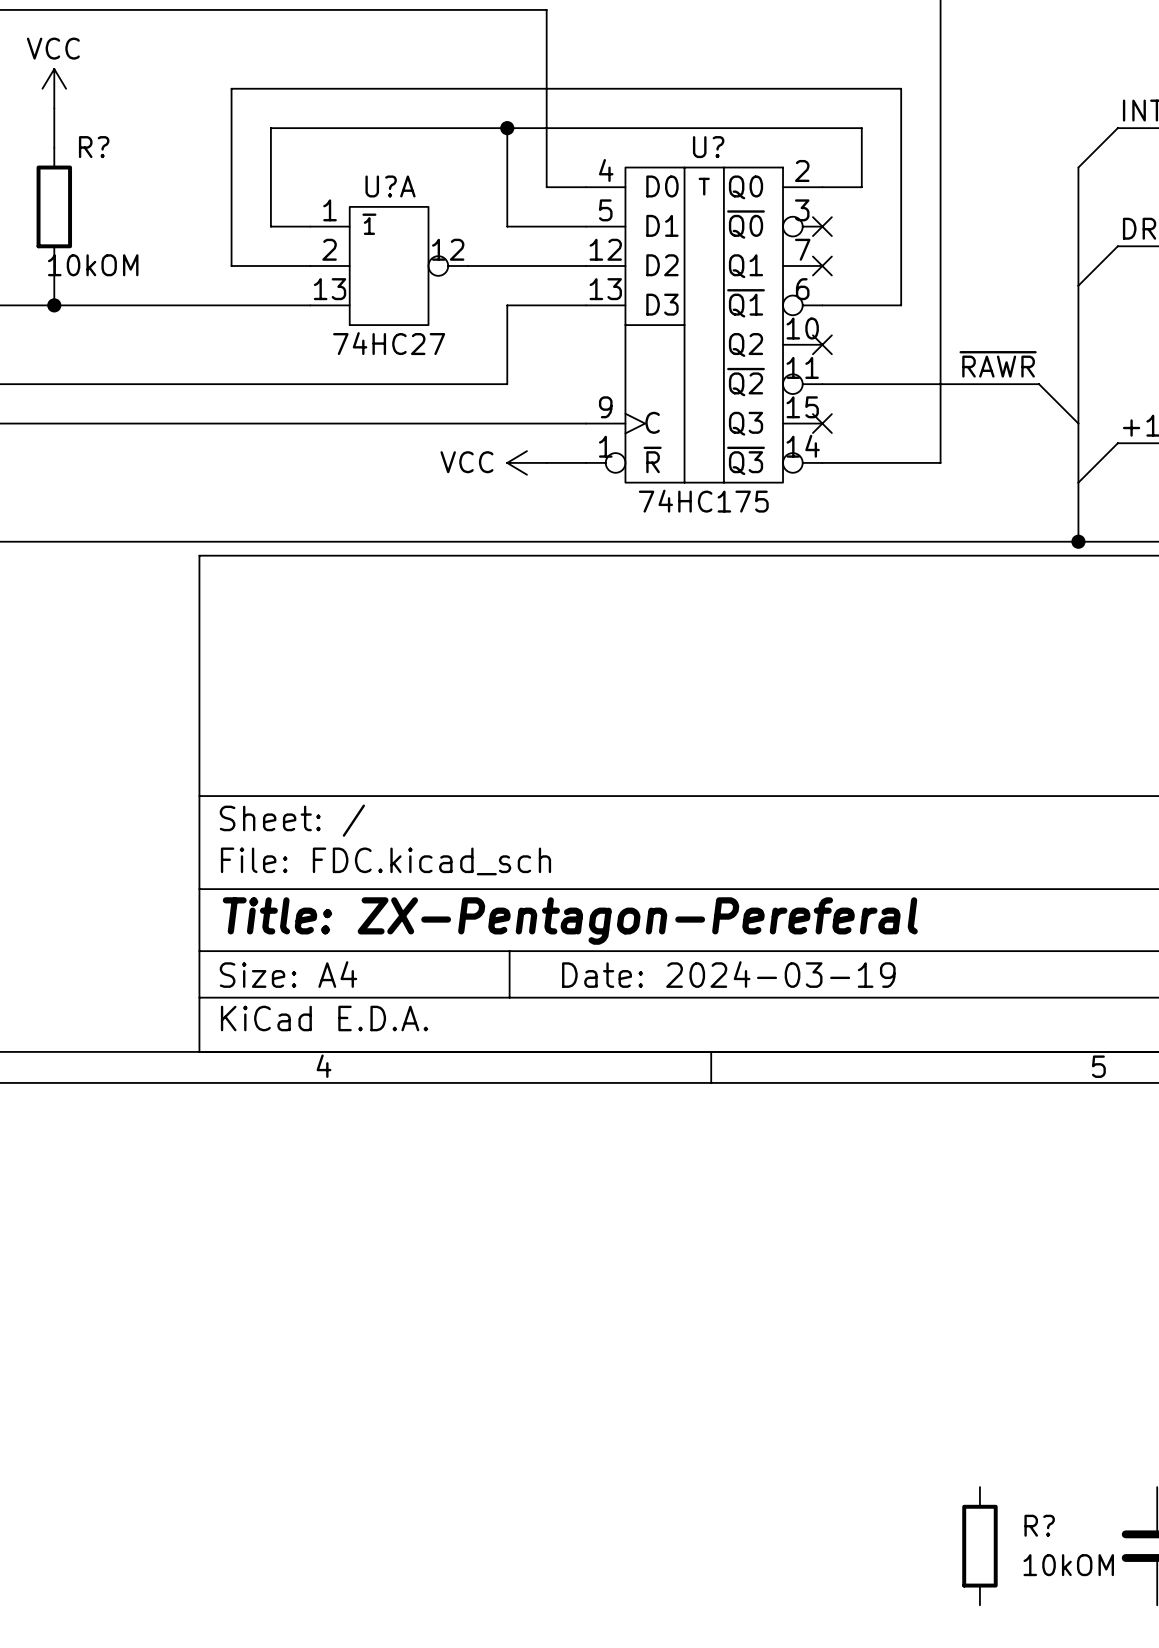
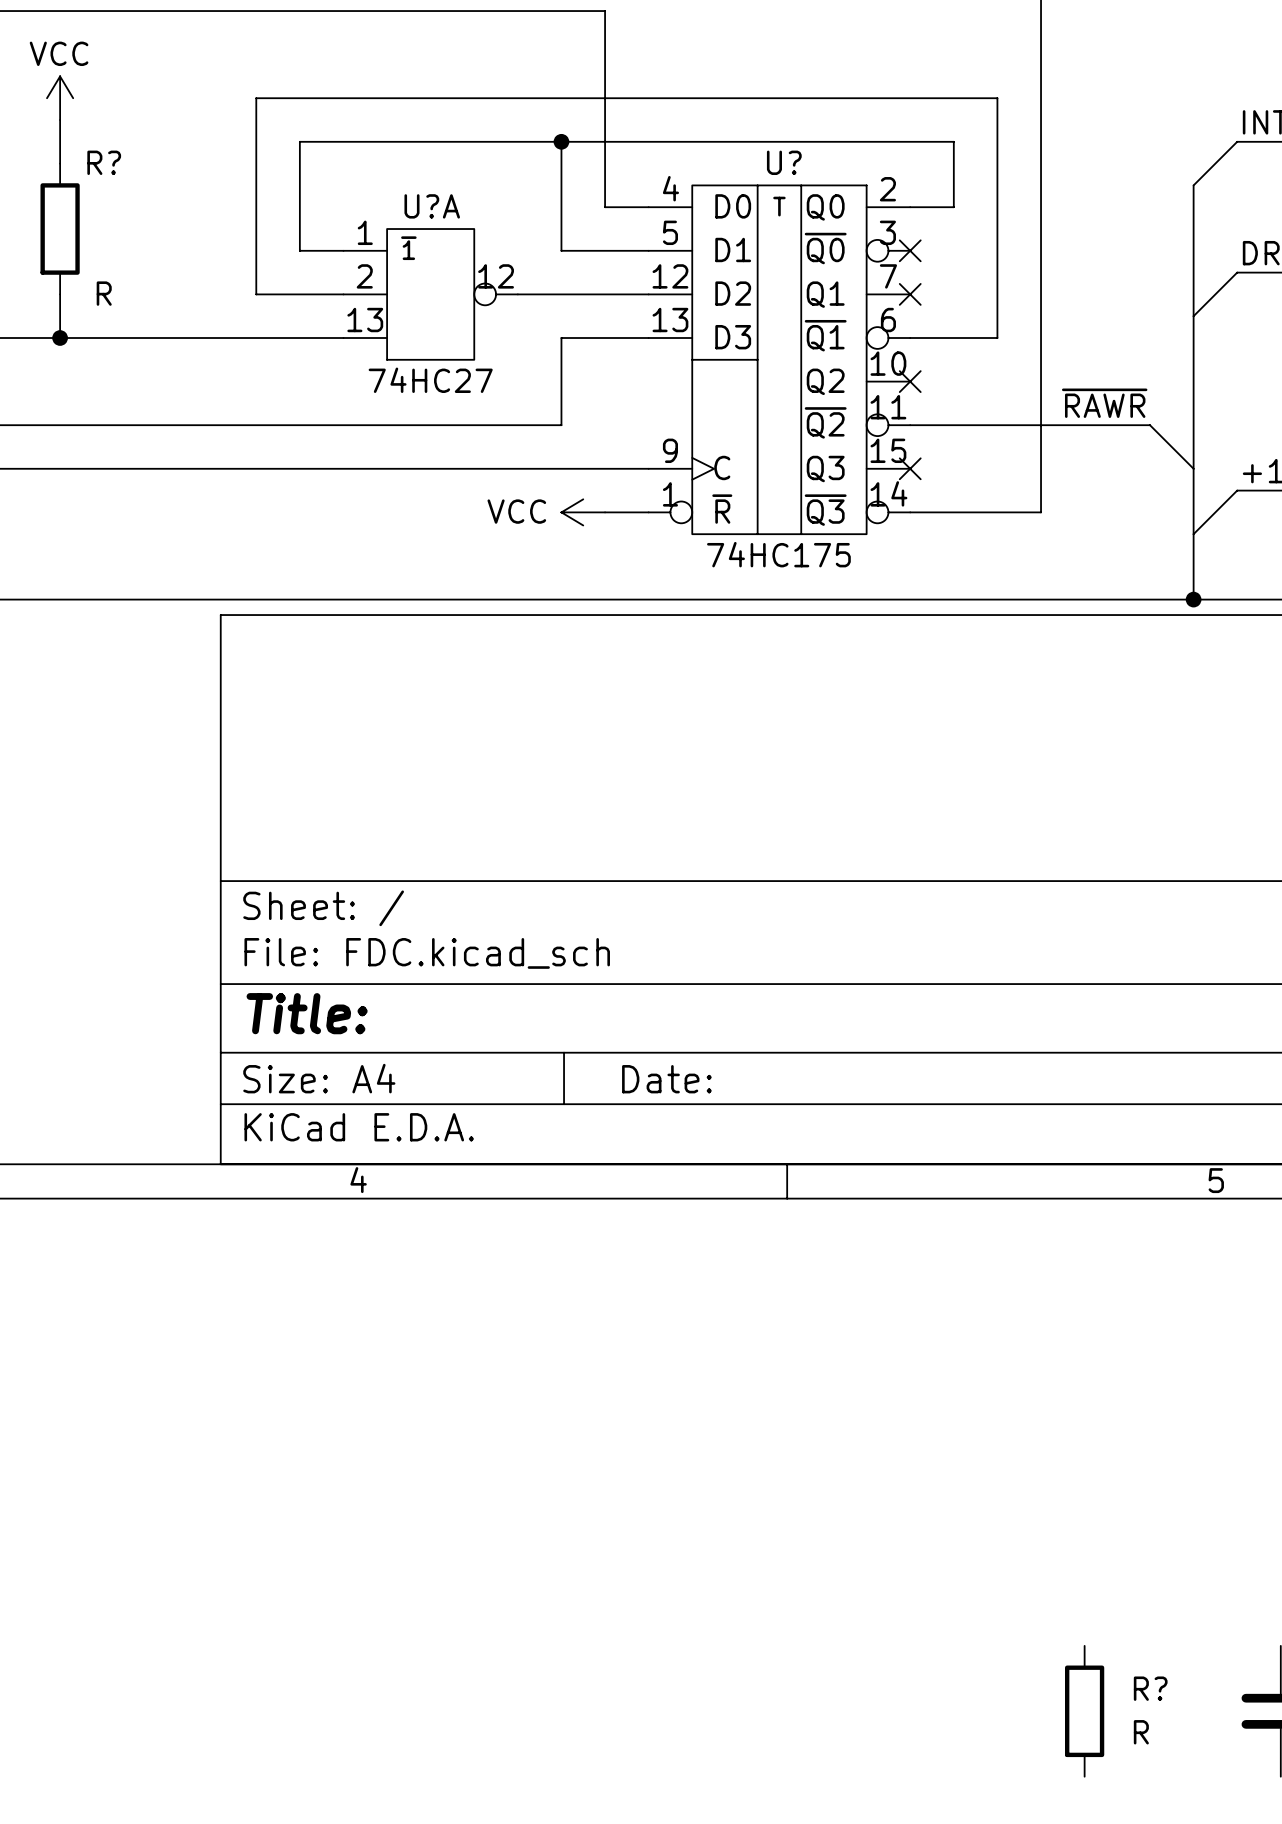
R? value: 10kOM (93, 265) -> R (104, 293)
title block: Title: ZX-Pentagon-Pereferal (570, 921) -> Title: (307, 1013)
title block: Date: 2024-03-19 (728, 974) -> Date: (666, 1079)
R? value: 10kOM (1068, 1565) -> R (1141, 1732)

